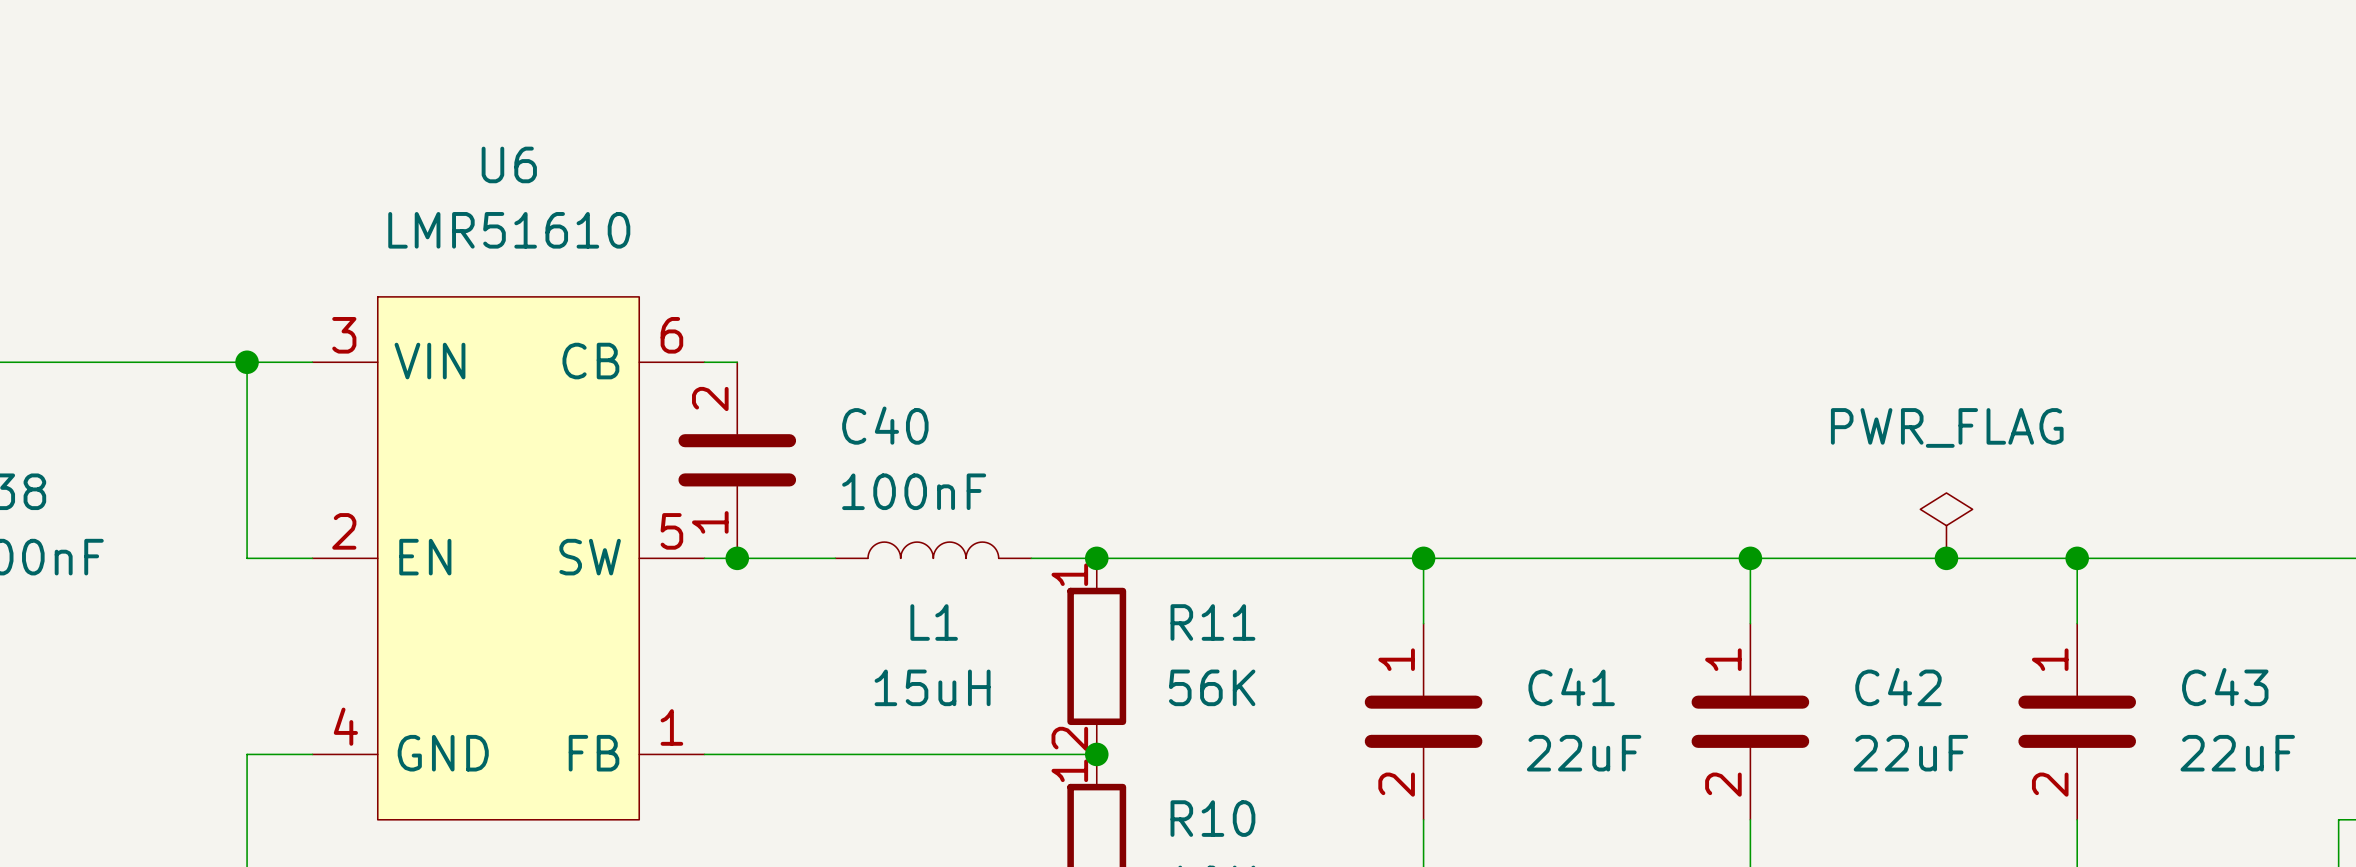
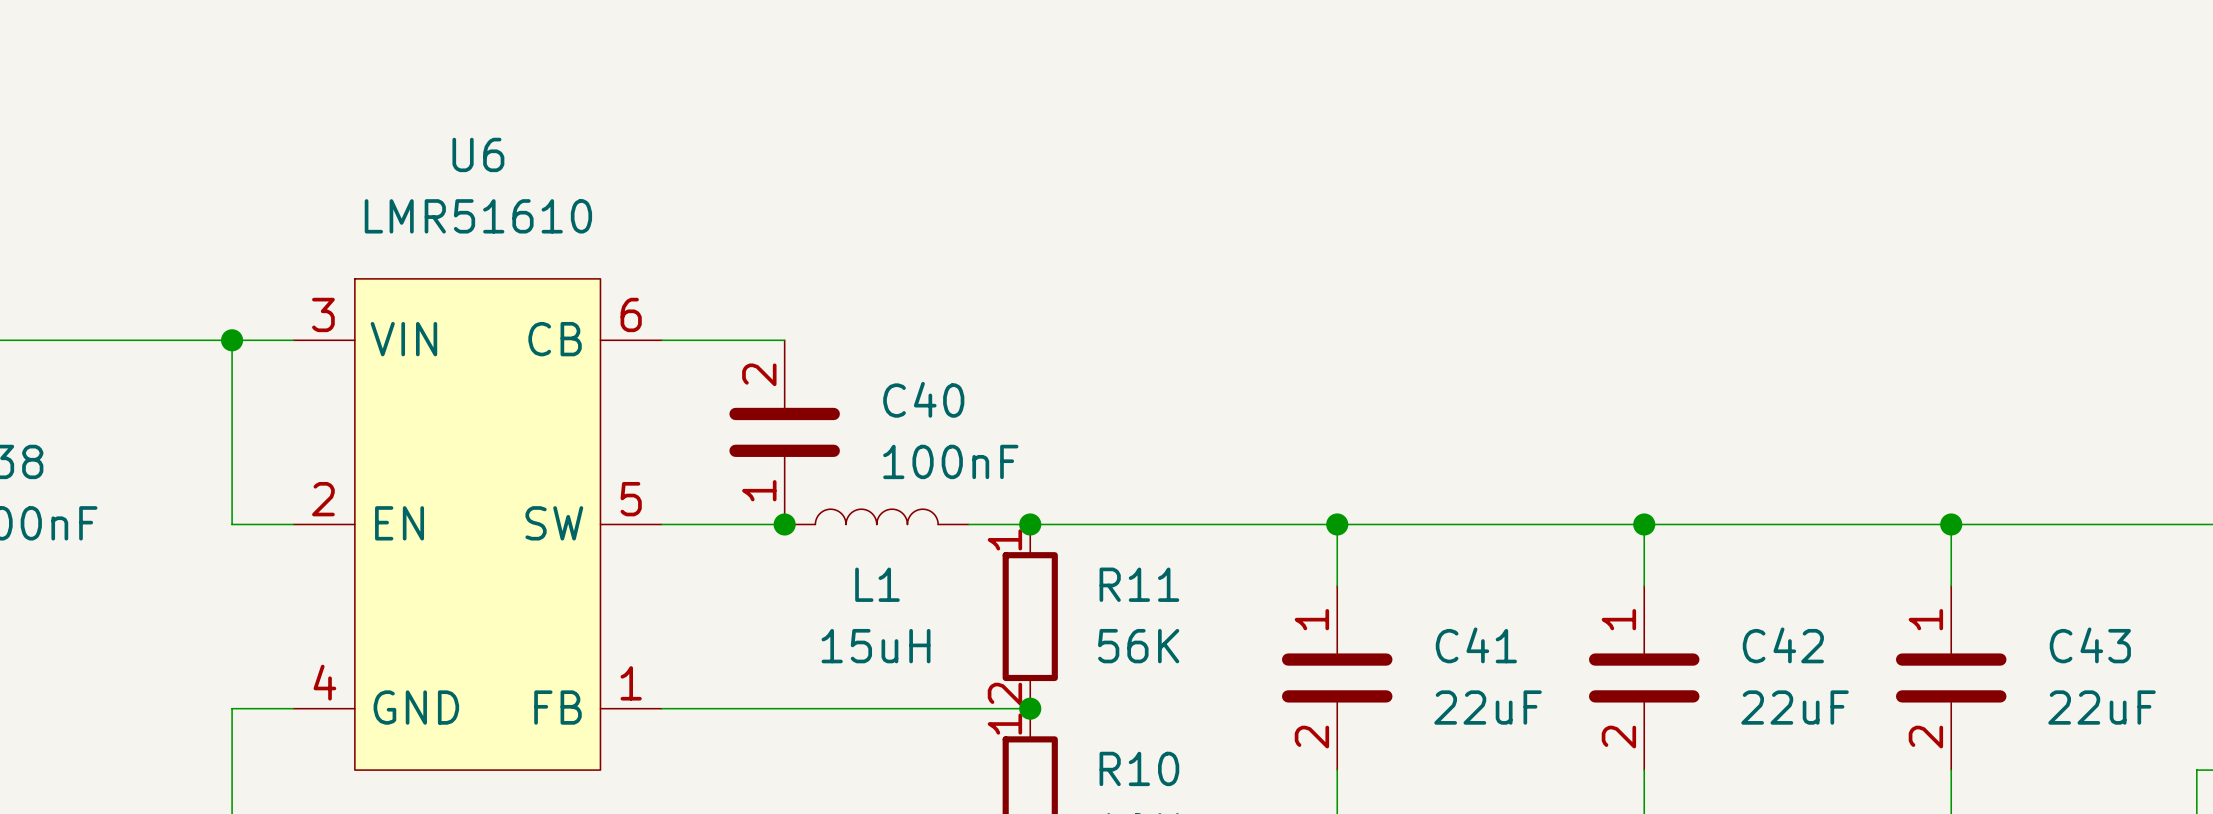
wire: none -> (692, 340) (784, 340)
C40 position: (737, 460) -> (784, 432)
power symbol: PWR_FLAG (1946, 525) -> none
junction position: (737, 558) -> (784, 524)
junction: (1946, 558) -> none

